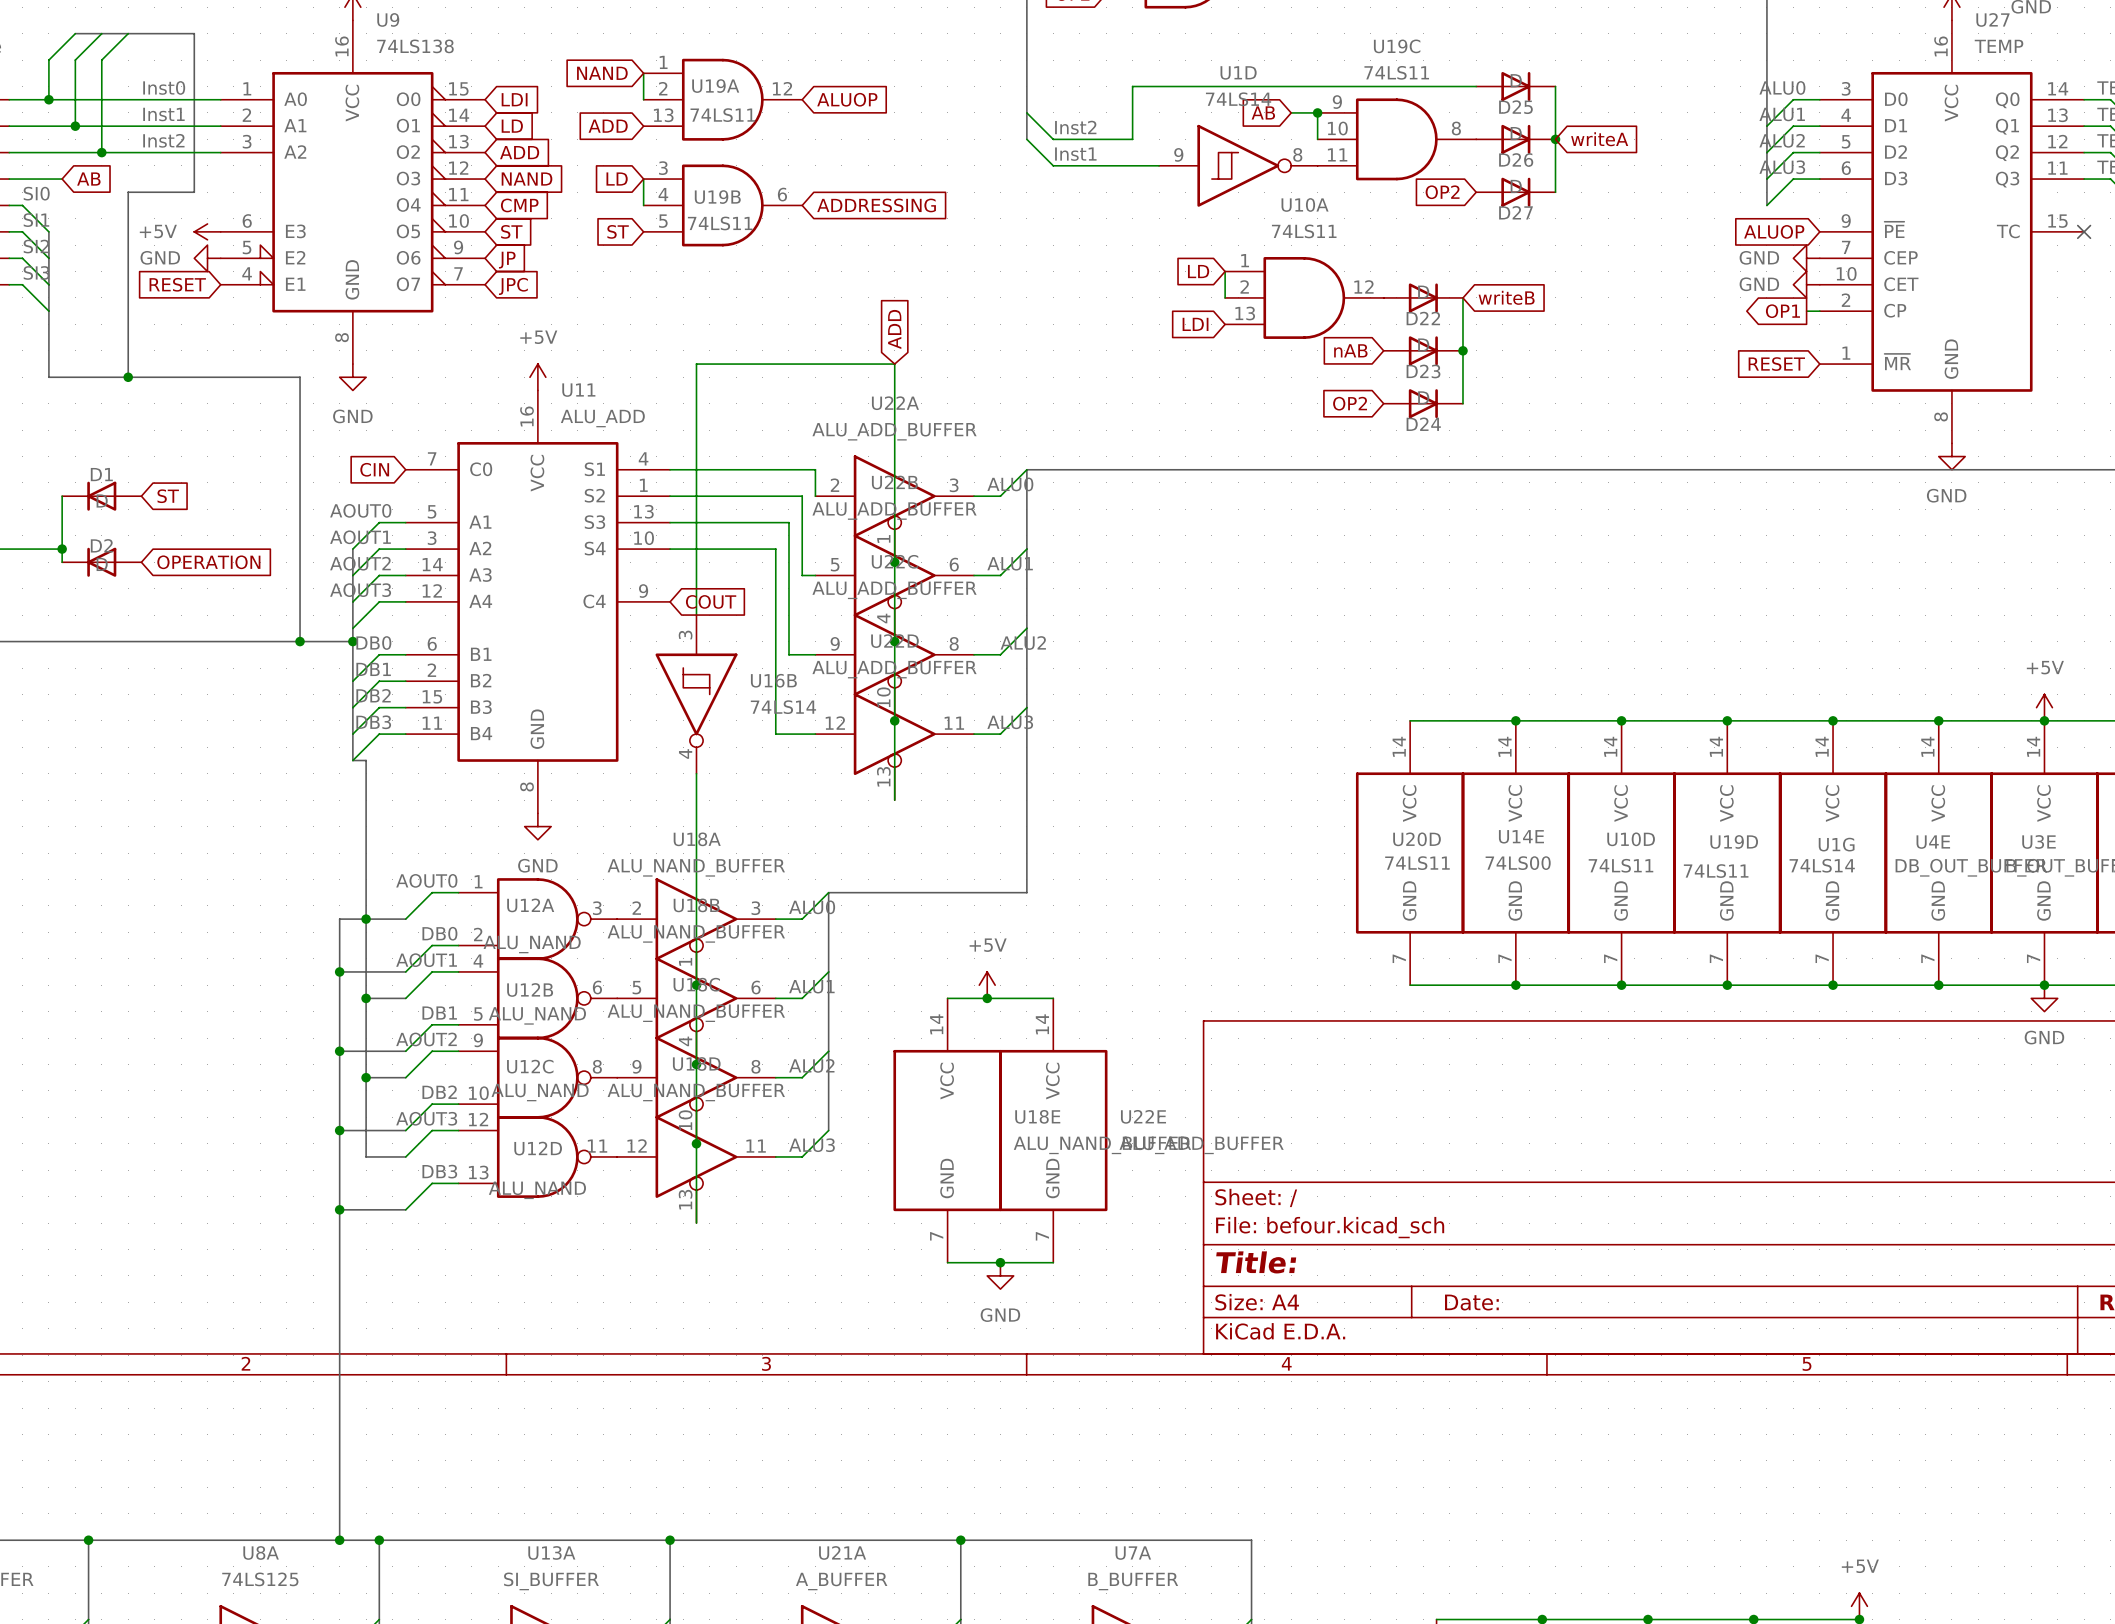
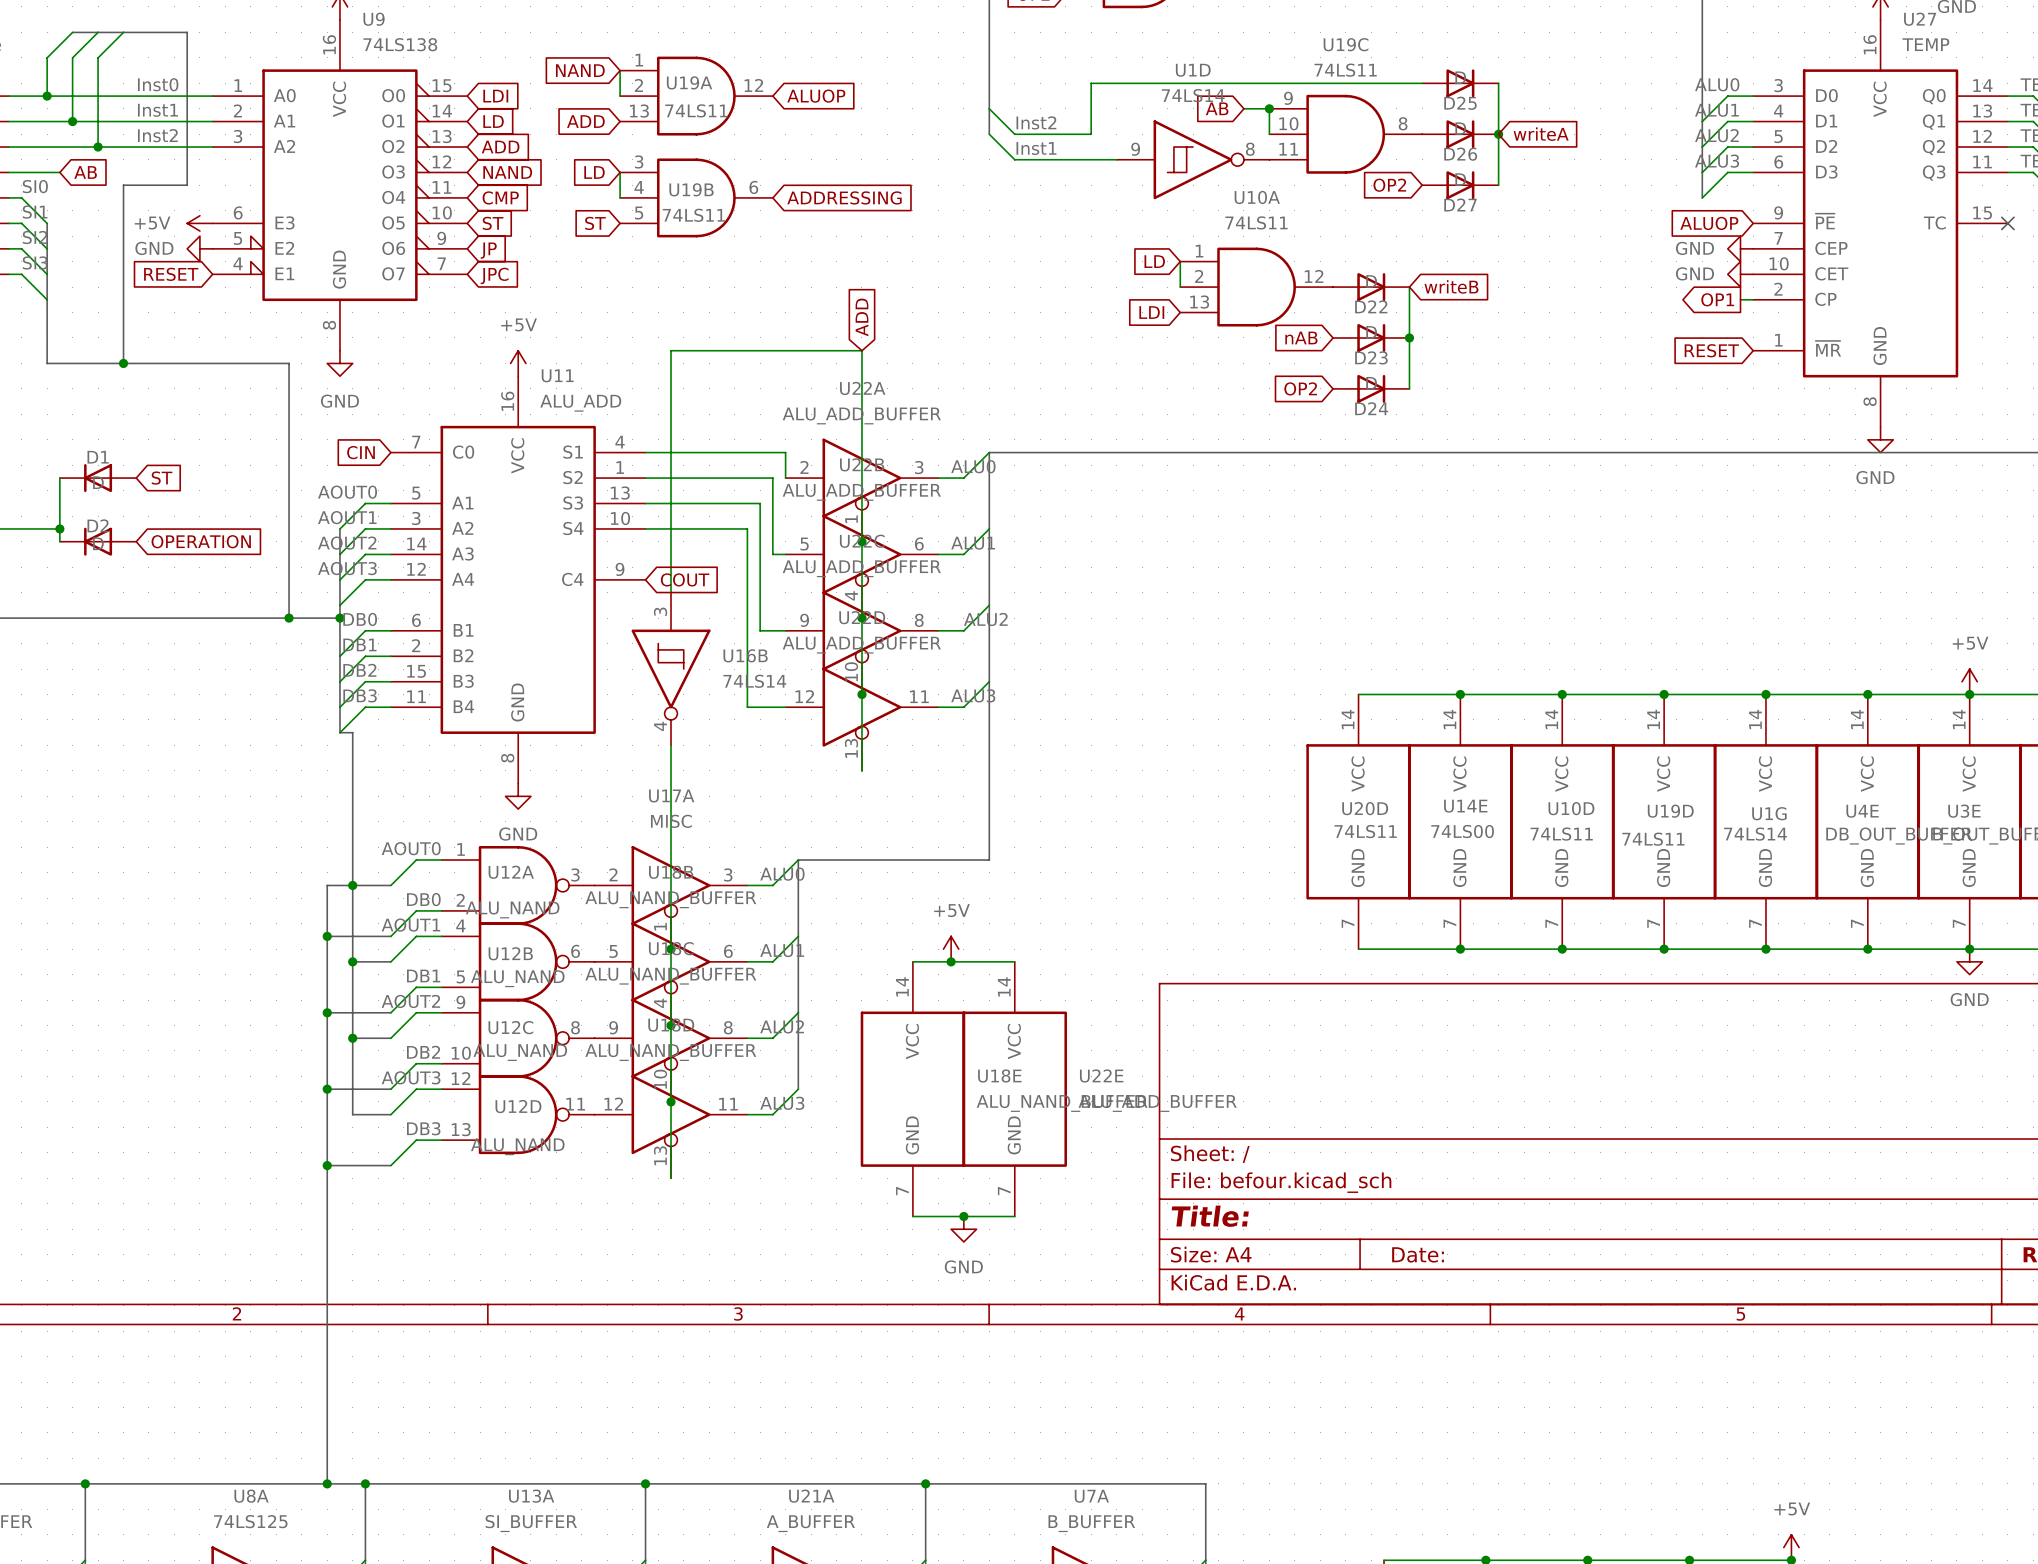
U18A name: U18A (697, 839) -> U17A (671, 796)
U18A value: ALU_NAND_BUFFER (696, 867) -> MISC (671, 821)

